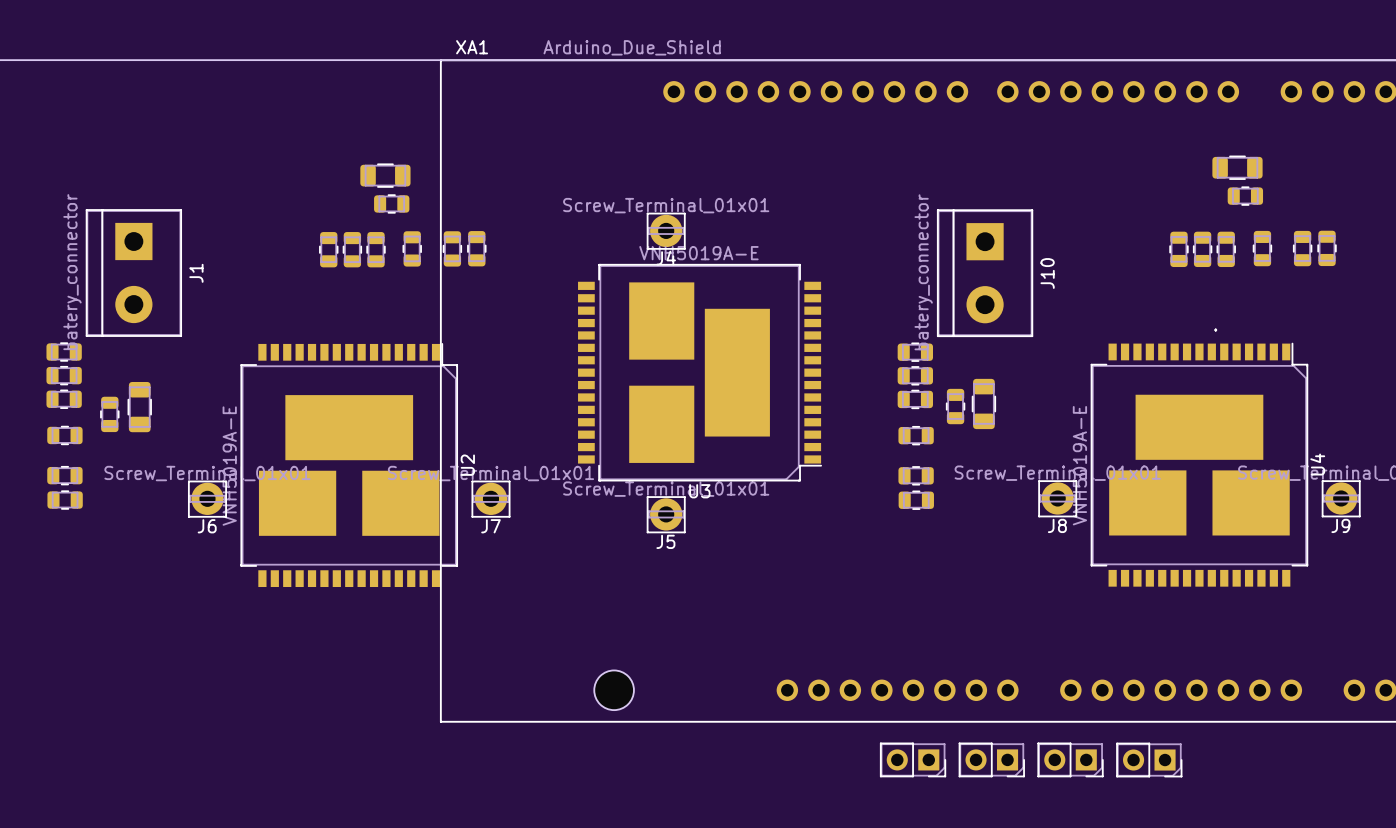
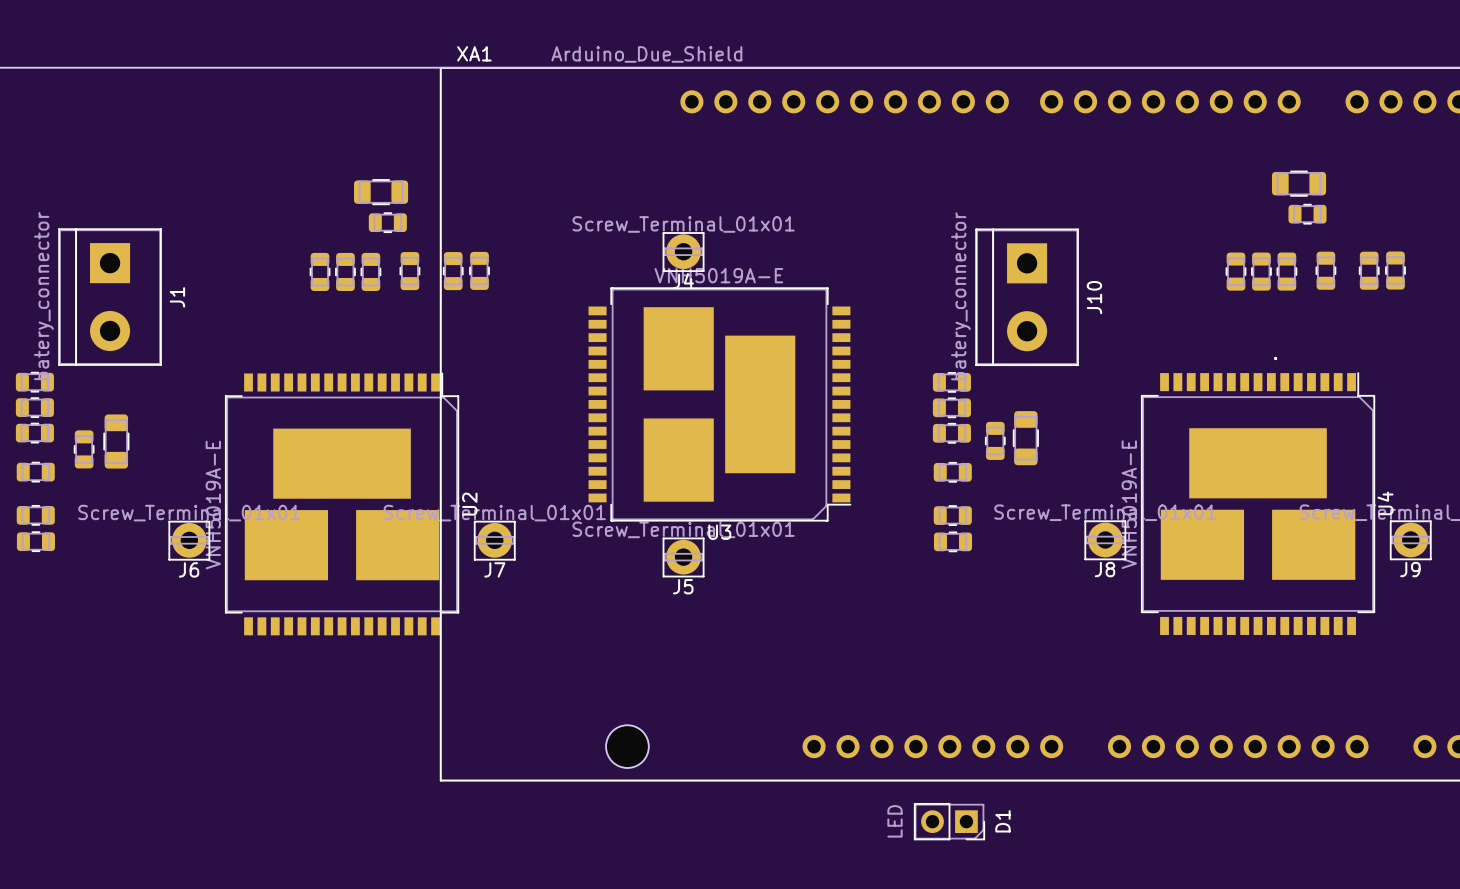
D1 value: none -> LED (895, 821)
D1 name: none -> D1 (1002, 821)
part: (991, 759) -> none
part: (1070, 759) -> none
part: (1149, 760) -> none

